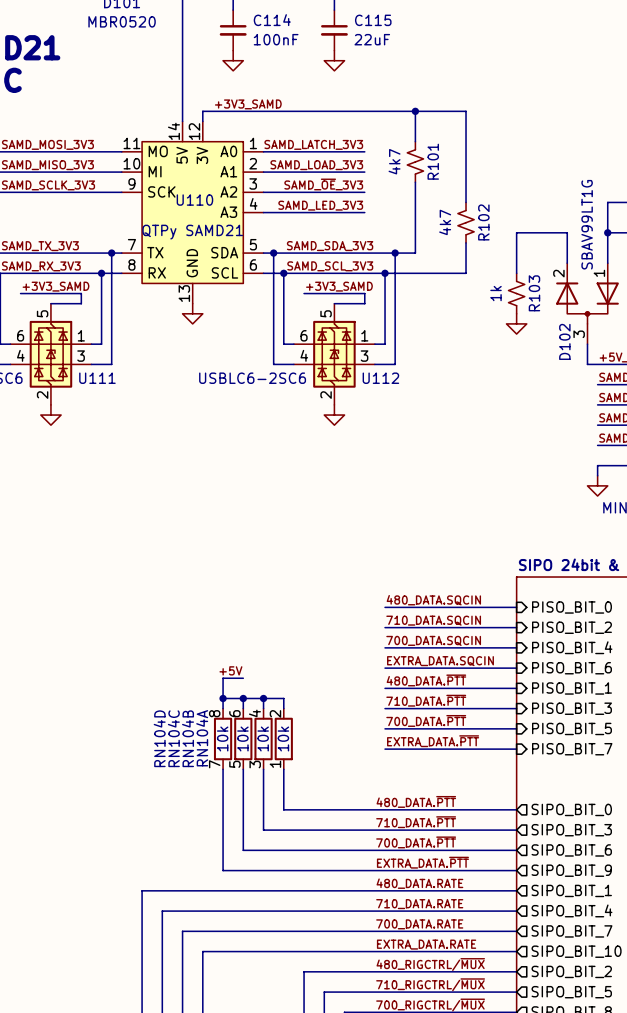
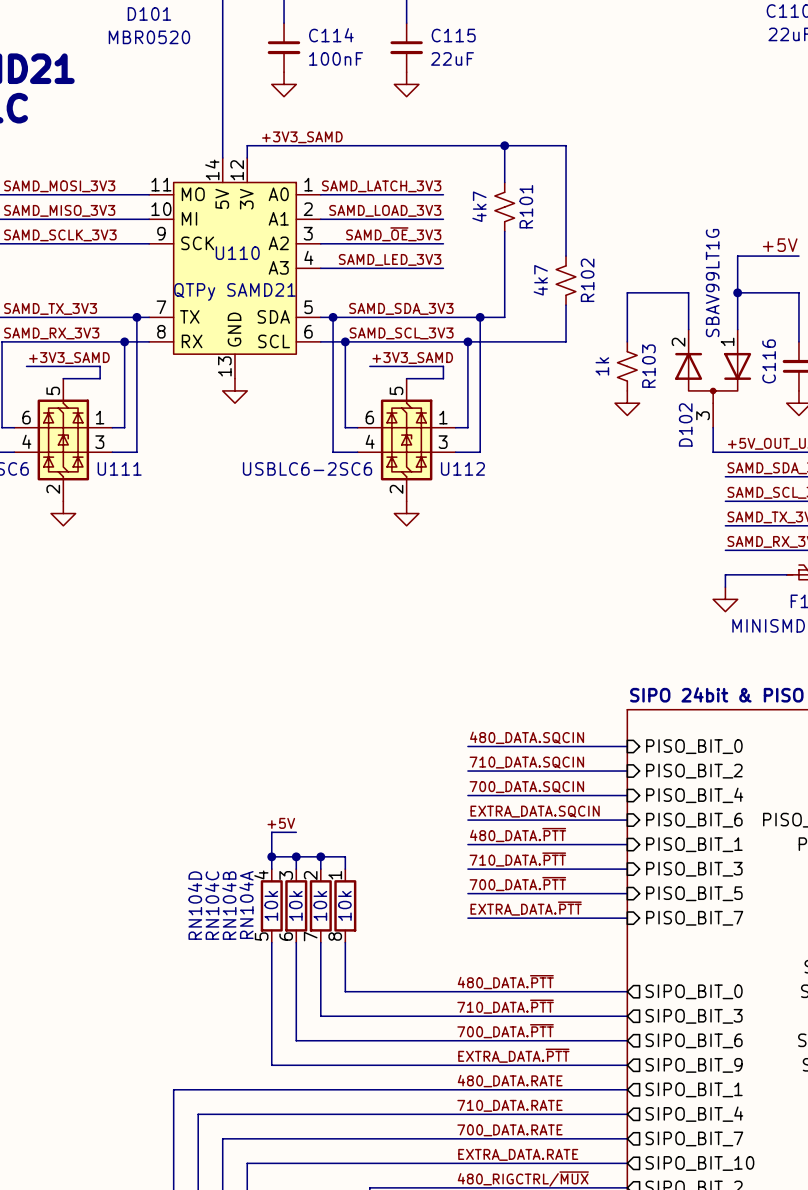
RN104D pin number: 8 (214, 713) -> 4 (261, 874)
RN104C pin number: 6 (234, 713) -> 3 (286, 875)
RN104B pin number: 4 (254, 713) -> 2 (310, 875)
RN104A pin number: 2 (275, 713) -> 1 (335, 875)
RN104D pin number: 7 (214, 764) -> 5 (261, 936)
RN104C pin number: 5 (234, 764) -> 6 (286, 936)
RN104B pin number: 3 (255, 764) -> 7 (310, 936)
RN104A pin number: 1 (275, 764) -> 8 (335, 936)

